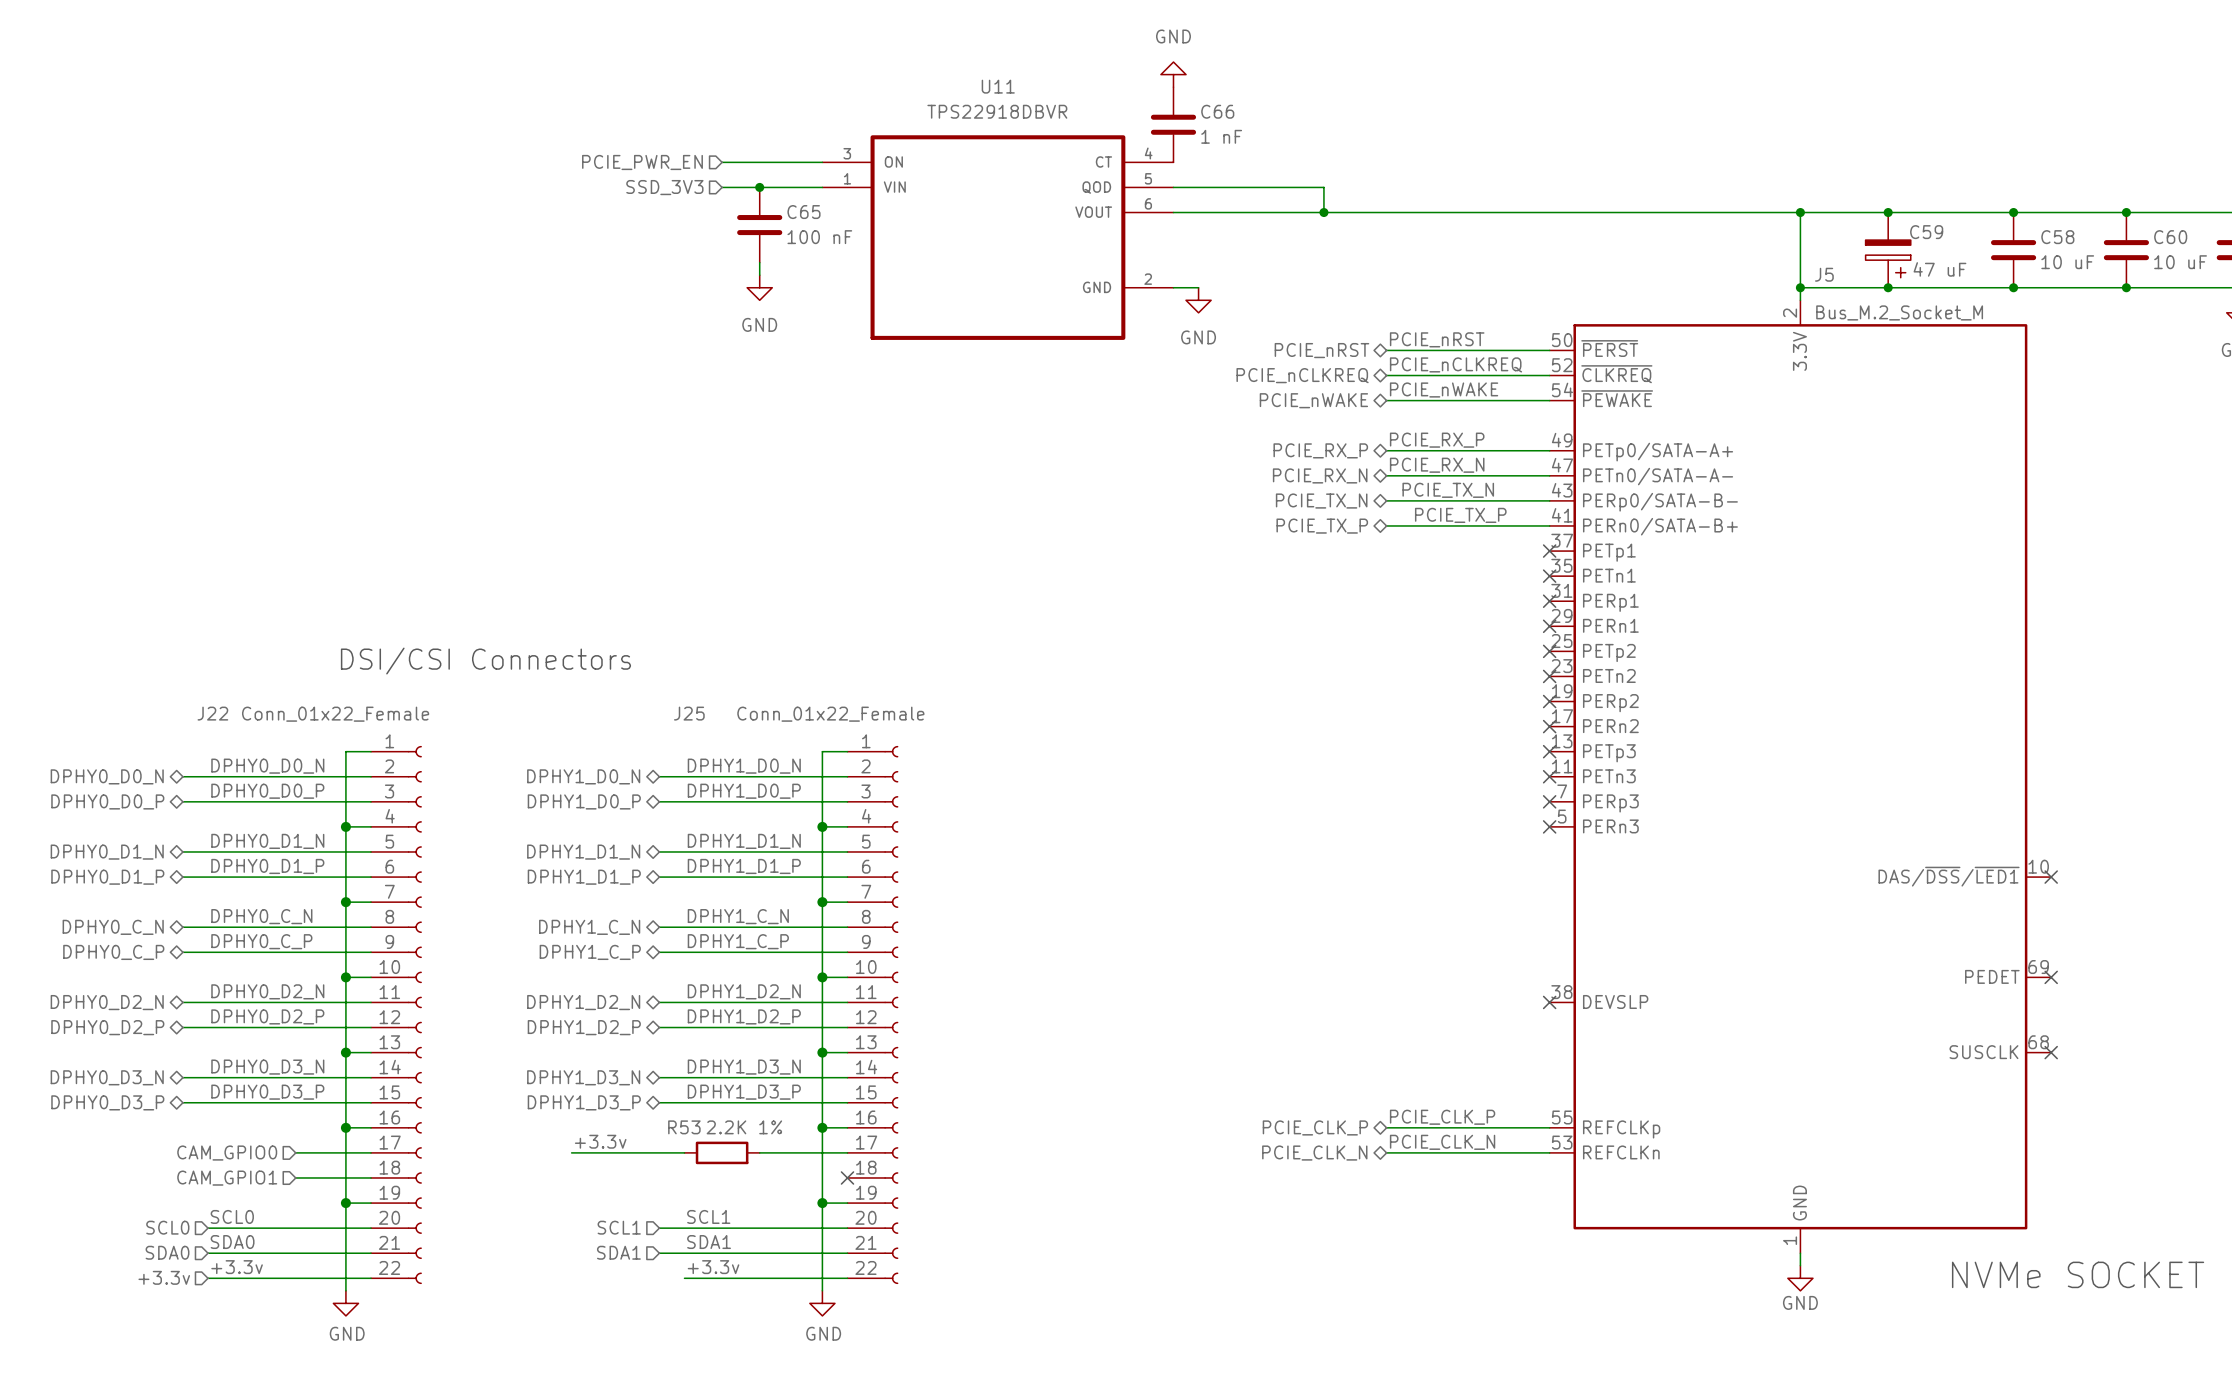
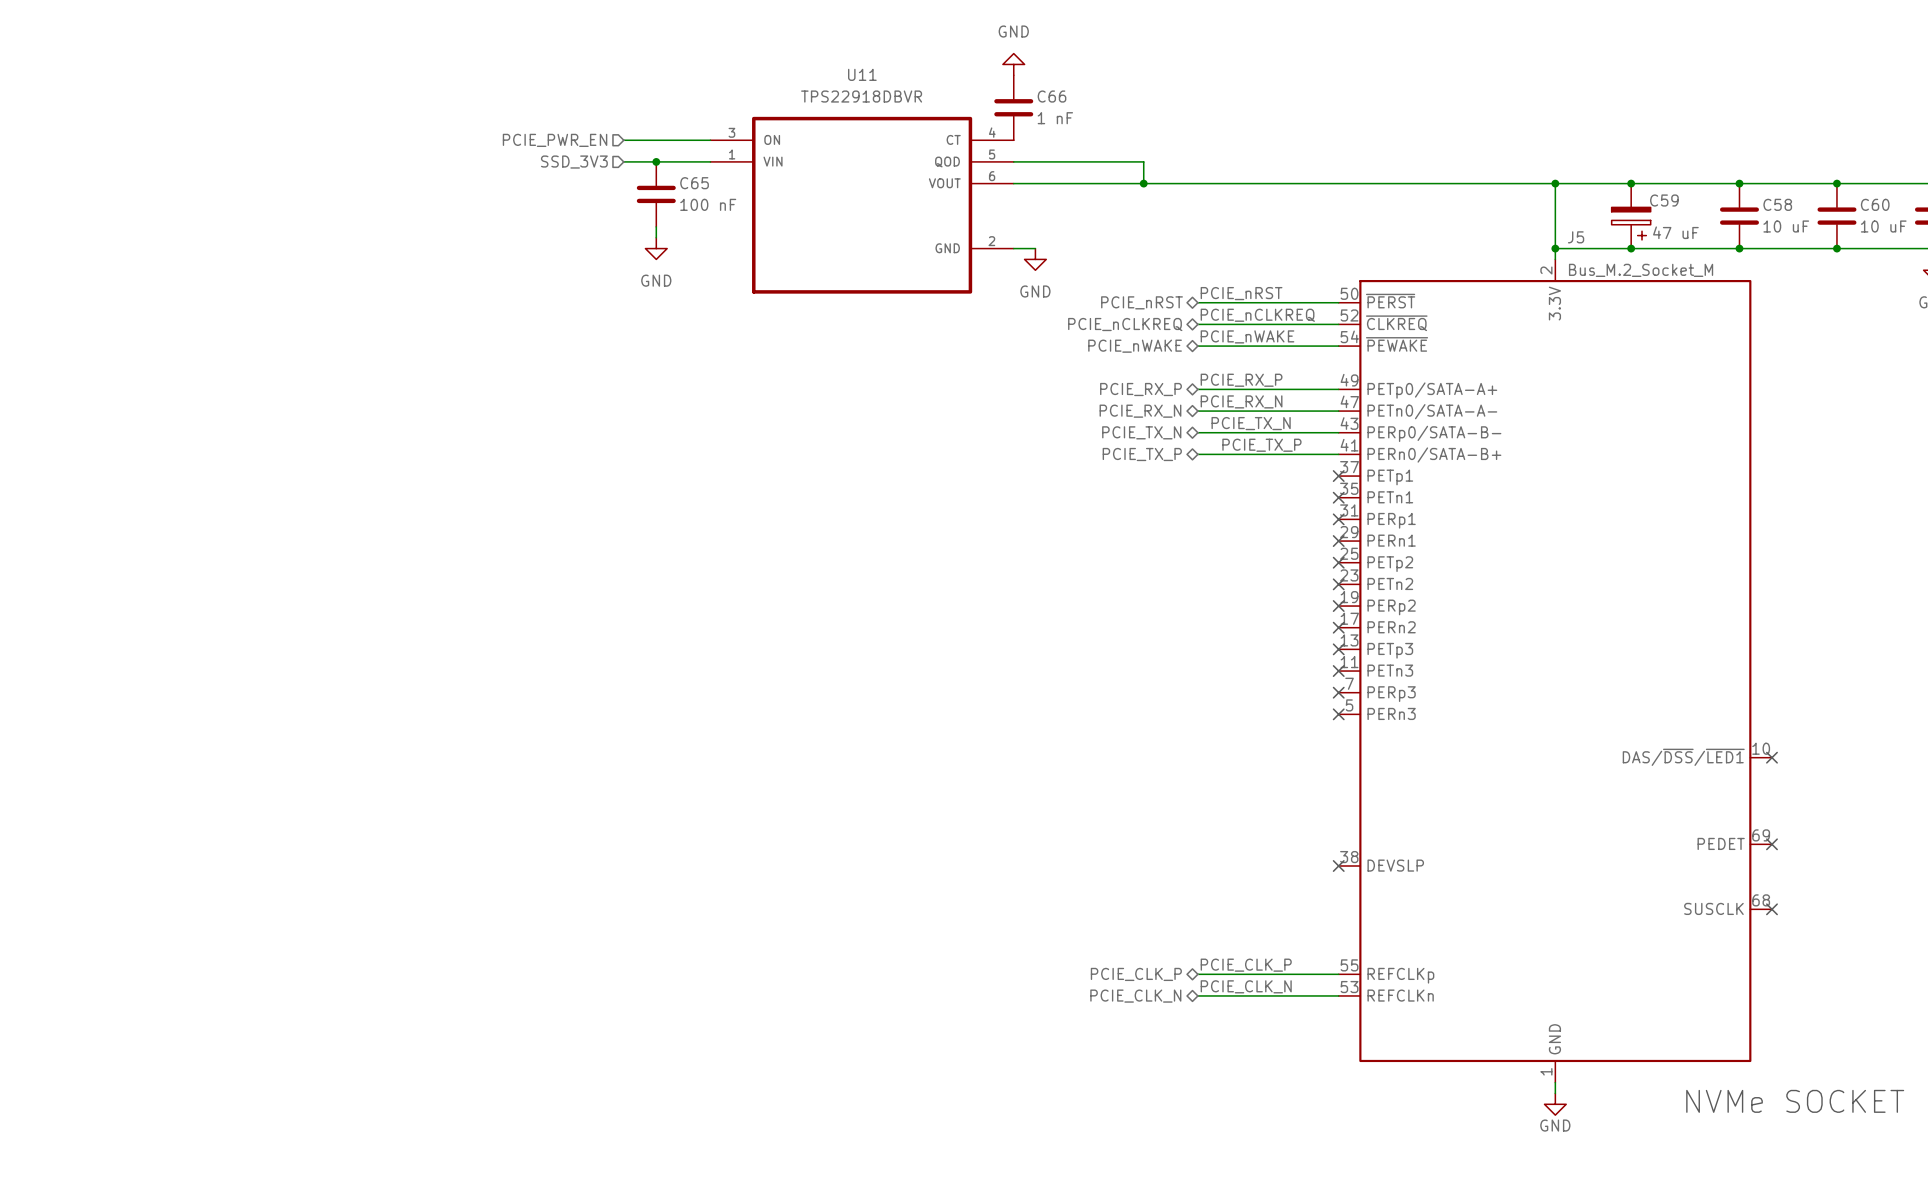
text: DSI/CSI Connectors (485, 661) -> none
wire: (371, 751) (345, 751) (345, 1290) -> none
wire: (847, 751) (822, 751) (822, 1290) -> none
label: DPHY0_D0_N (267, 766) -> none
label: DPHY1_D0_N (744, 766) -> none
hierarchical label: DPHY0_D0_N (107, 776) -> none
wire: (182, 776) (371, 776) -> none
hierarchical label: DPHY1_D0_N (583, 776) -> none
wire: (659, 776) (847, 776) -> none
label: DPHY0_D0_P (267, 791) -> none
label: DPHY1_D0_P (744, 791) -> none
hierarchical label: DPHY0_D0_P (107, 801) -> none
wire: (182, 801) (371, 801) -> none
hierarchical label: DPHY1_D0_P (584, 801) -> none
wire: (659, 801) (847, 801) -> none
wire: (345, 826) (371, 826) -> none
junction: (345, 826) -> none
wire: (822, 826) (847, 826) -> none
junction: (822, 826) -> none
label: DPHY0_D1_N (267, 841) -> none
label: DPHY1_D1_N (744, 841) -> none
wire: (182, 851) (371, 851) -> none
wire: (659, 851) (847, 851) -> none
hierarchical label: DPHY0_D1_N (107, 852) -> none
hierarchical label: DPHY1_D1_N (583, 852) -> none
label: DPHY0_D1_P (267, 866) -> none
label: DPHY1_D1_P (744, 866) -> none
hierarchical label: DPHY0_D1_P (107, 877) -> none
wire: (182, 877) (371, 877) -> none
hierarchical label: DPHY1_D1_P (584, 877) -> none
wire: (659, 877) (847, 877) -> none
wire: (345, 902) (371, 902) -> none
junction: (345, 902) -> none
wire: (822, 902) (847, 902) -> none
junction: (822, 902) -> none
label: DPHY0_C_N (261, 916) -> none
label: DPHY1_C_N (738, 916) -> none
hierarchical label: DPHY0_C_N (113, 927) -> none
wire: (182, 927) (371, 927) -> none
hierarchical label: DPHY1_C_N (589, 927) -> none
wire: (659, 927) (847, 927) -> none
label: DPHY0_C_P (261, 941) -> none
label: DPHY1_C_P (738, 941) -> none
hierarchical label: DPHY0_C_P (113, 952) -> none
wire: (182, 952) (371, 952) -> none
hierarchical label: DPHY1_C_P (590, 952) -> none
wire: (659, 952) (847, 952) -> none
wire: (345, 977) (371, 977) -> none
junction: (345, 977) -> none
wire: (822, 977) (847, 977) -> none
junction: (822, 977) -> none
label: DPHY0_D2_N (267, 991) -> none
label: DPHY1_D2_N (744, 991) -> none
hierarchical label: DPHY0_D2_N (107, 1002) -> none
wire: (182, 1002) (371, 1002) -> none
hierarchical label: DPHY1_D2_N (583, 1002) -> none
wire: (659, 1002) (847, 1002) -> none
J22: Conn_01x22_Female (396, 1014) -> none
J25: Conn_01x22_Female (872, 1014) -> none
label: DPHY0_D2_P (267, 1016) -> none
label: DPHY1_D2_P (744, 1016) -> none
hierarchical label: DPHY0_D2_P (107, 1027) -> none
wire: (182, 1027) (371, 1027) -> none
hierarchical label: DPHY1_D2_P (584, 1027) -> none
wire: (659, 1027) (847, 1027) -> none
wire: (345, 1052) (371, 1052) -> none
junction: (345, 1052) -> none
wire: (822, 1052) (847, 1052) -> none
junction: (822, 1052) -> none
label: DPHY0_D3_N (267, 1067) -> none
label: DPHY1_D3_N (744, 1067) -> none
hierarchical label: DPHY0_D3_N (107, 1077) -> none
wire: (182, 1077) (371, 1077) -> none
hierarchical label: DPHY1_D3_N (583, 1077) -> none
wire: (659, 1077) (847, 1077) -> none
label: DPHY0_D3_P (267, 1092) -> none
label: DPHY1_D3_P (744, 1092) -> none
hierarchical label: DPHY0_D3_P (107, 1102) -> none
wire: (182, 1102) (371, 1102) -> none
hierarchical label: DPHY1_D3_P (584, 1102) -> none
wire: (659, 1102) (847, 1102) -> none
wire: (345, 1127) (371, 1127) -> none
junction: (345, 1127) -> none
wire: (822, 1127) (847, 1127) -> none
junction: (822, 1127) -> none
label: +3.3v (600, 1141) -> none
wire: (295, 1152) (371, 1152) -> none
wire: (571, 1152) (684, 1152) -> none
R53: 2.2K 1% (722, 1152) -> none
wire: (759, 1152) (847, 1152) -> none
hierarchical label: CAM_GPIO0 (227, 1153) -> none
wire: (295, 1177) (371, 1177) -> none
no-connect mark: (847, 1177) -> none
hierarchical label: CAM_GPIO1 (227, 1178) -> none
wire: (345, 1203) (371, 1203) -> none
junction: (345, 1203) -> none
wire: (822, 1203) (847, 1203) -> none
junction: (822, 1203) -> none
label: SCL0 (232, 1216) -> none
label: SCL1 (708, 1216) -> none
hierarchical label: SCL0 (167, 1227) -> none
hierarchical label: SCL1 (619, 1227) -> none
wire: (208, 1228) (371, 1228) -> none
wire: (659, 1228) (847, 1228) -> none
label: SDA0 (232, 1242) -> none
label: SDA1 (709, 1242) -> none
hierarchical label: SDA0 (167, 1252) -> none
hierarchical label: SDA1 (618, 1252) -> none
wire: (208, 1253) (371, 1253) -> none
wire: (659, 1253) (847, 1253) -> none
label: +3.3v (237, 1267) -> none
label: +3.3v (713, 1267) -> none
hierarchical label: +3.3v (164, 1277) -> none
wire: (208, 1278) (371, 1278) -> none
wire: (684, 1278) (847, 1278) -> none
power symbol: GND (345, 1303) -> none
power symbol: GND (822, 1303) -> none

